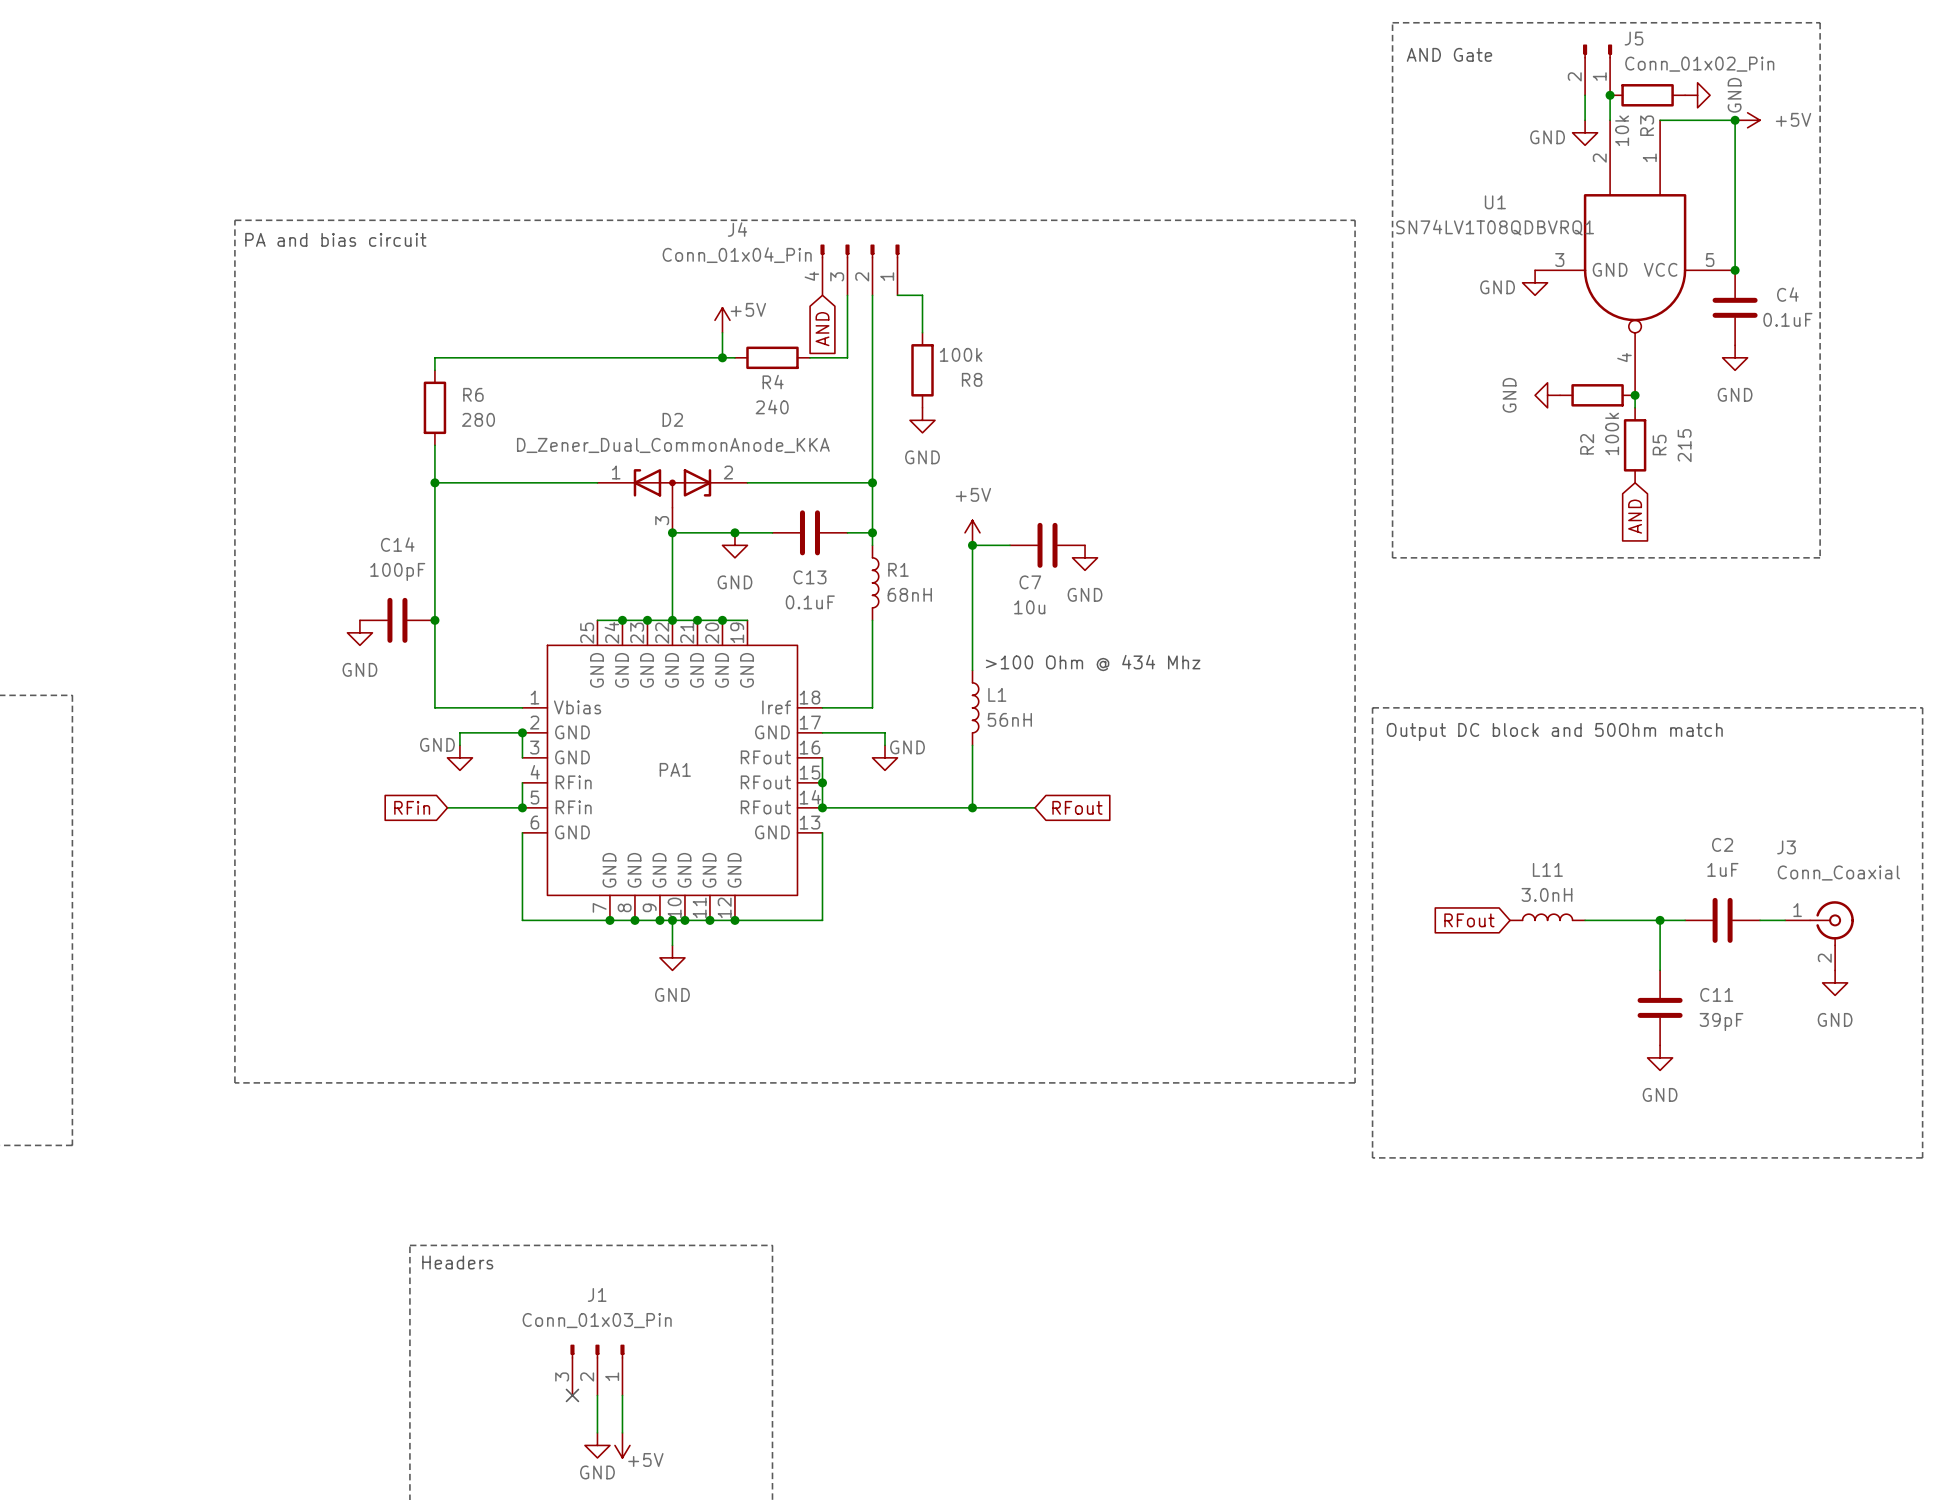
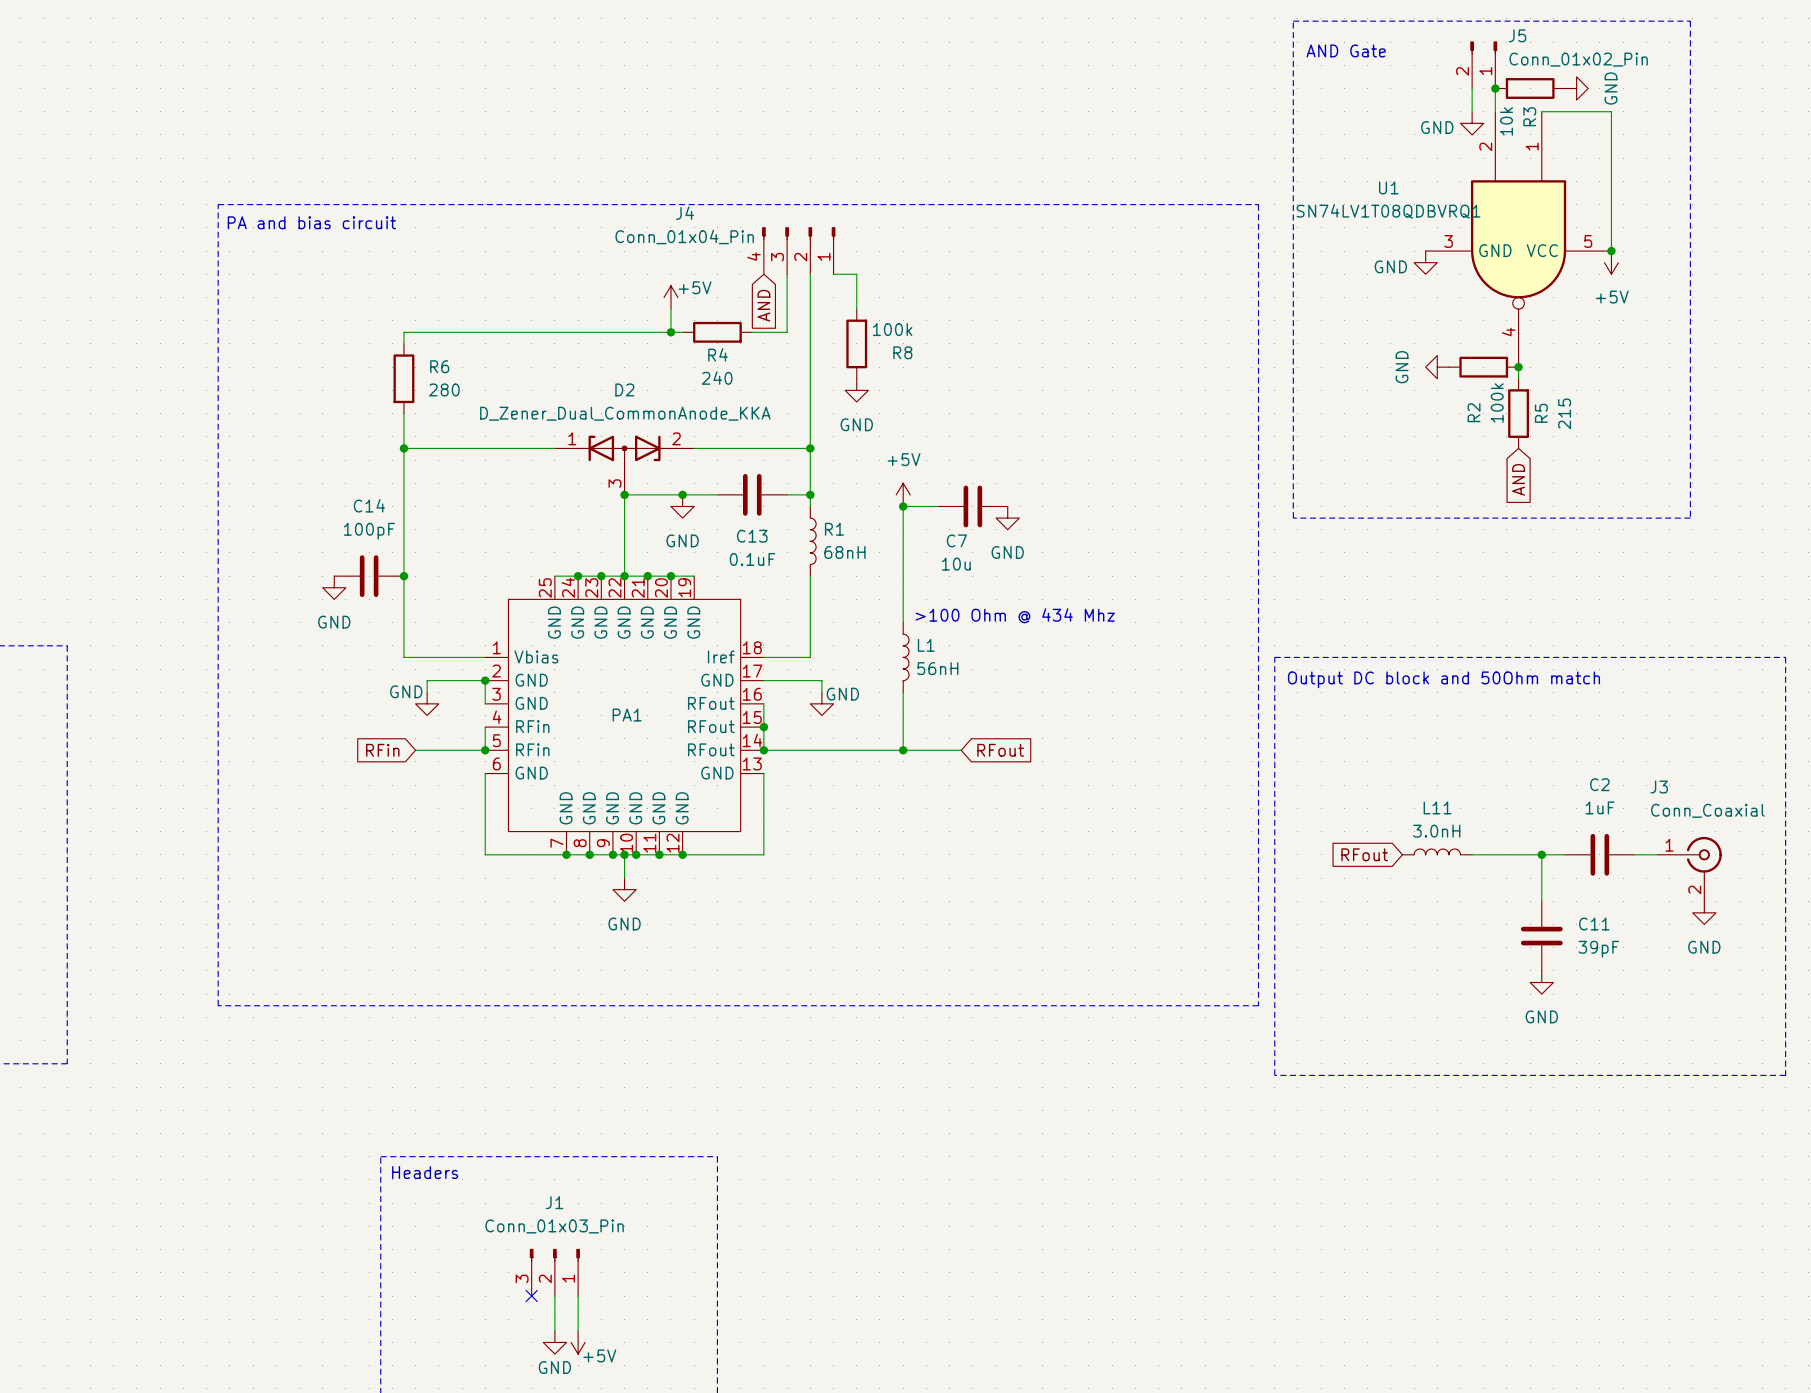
junction: (1735, 120) -> none
power symbol rotation: 0° (1747, 120) -> 90° clockwise (1611, 262)
power symbol position: +5V (1747, 120) -> +5V (1611, 262)
C4: 0.1uF (1735, 307) -> none
power symbol: GND (1735, 357) -> none

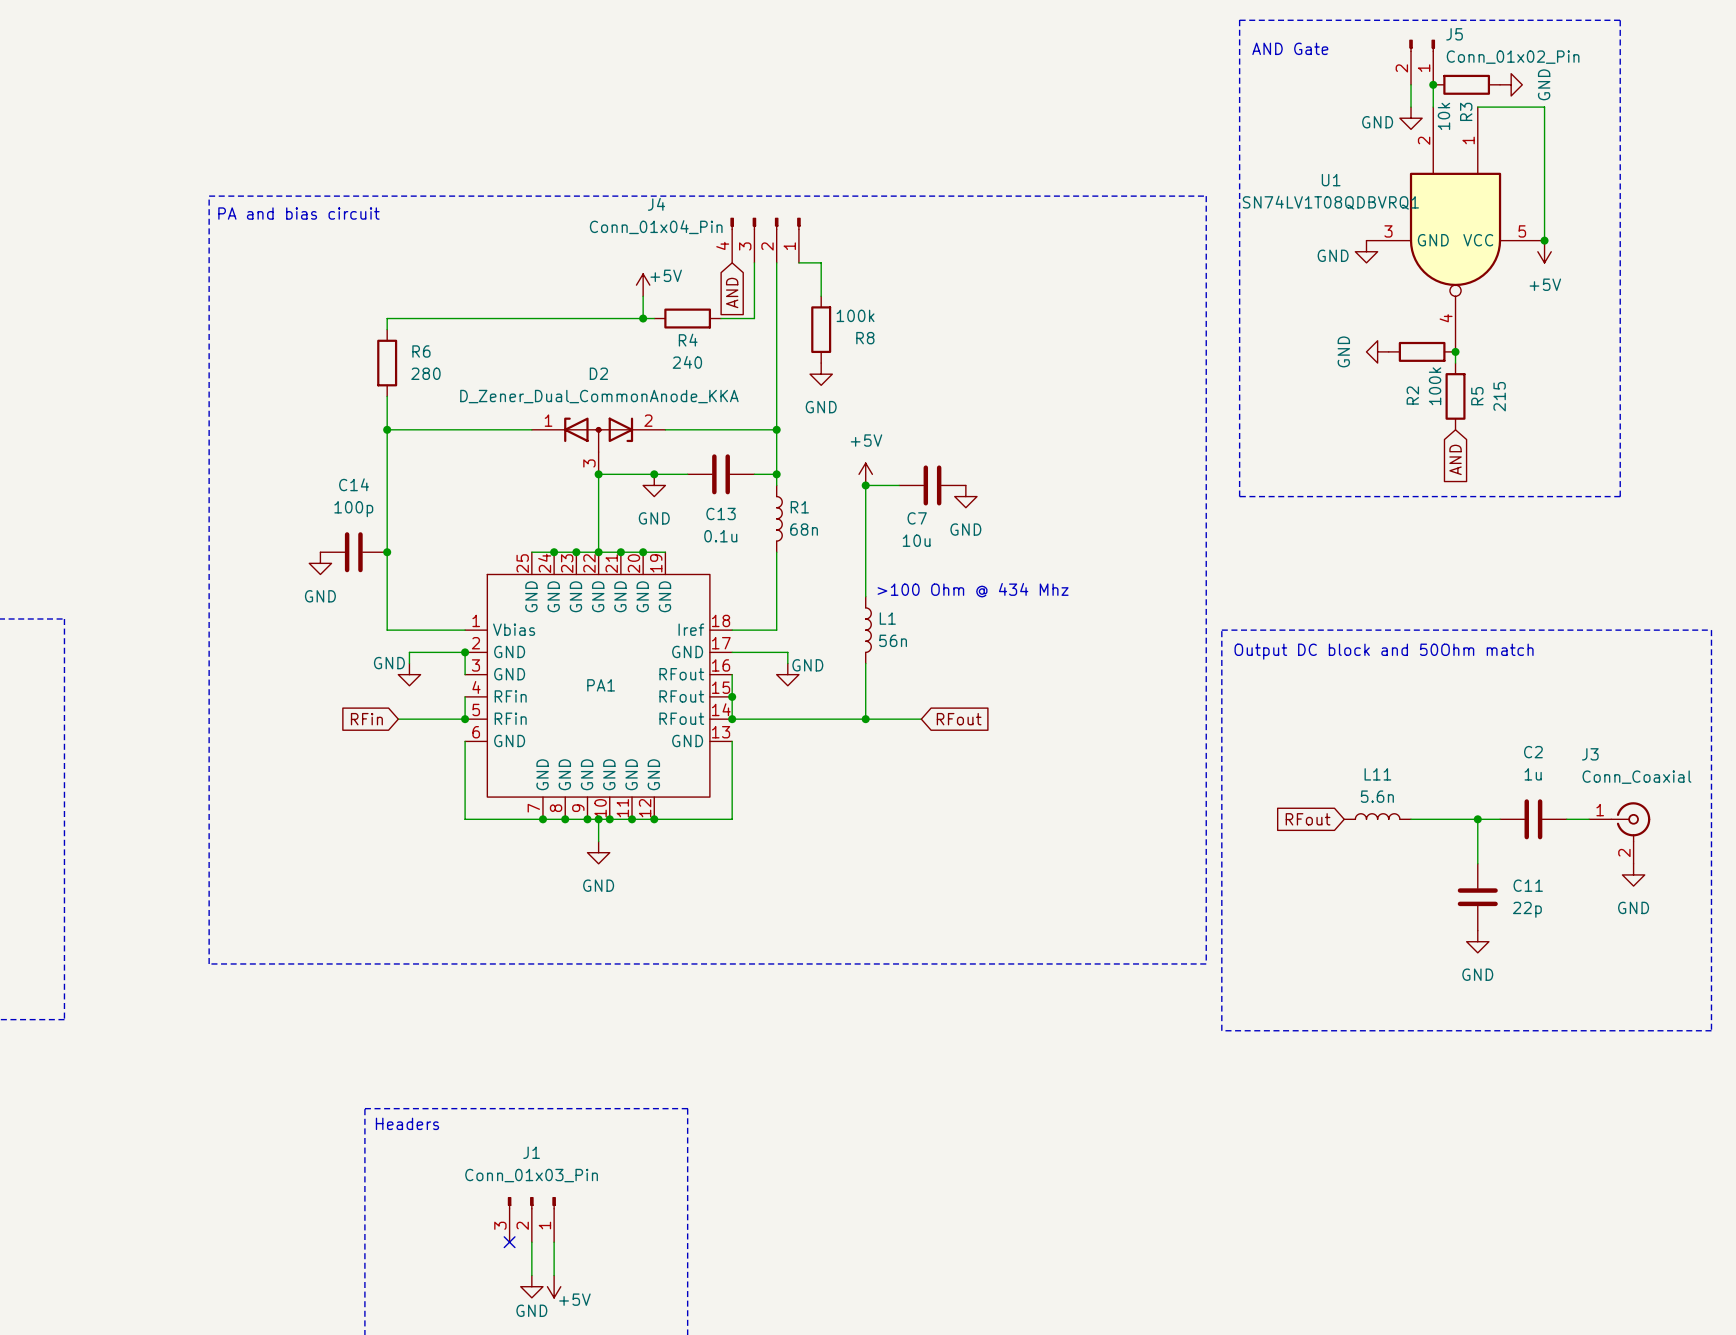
C14 value: 100pF (369, 531) -> 100p (353, 509)
R1 value: 68nH (844, 552) -> 68n (804, 529)
C13 value: 0.1uF (752, 559) -> 0.1u (720, 536)
L1 value: 56nH (937, 668) -> 56n (893, 640)
C2 value: 1uF (1600, 807) -> 1u (1533, 774)
L11 value: 3.0nH (1436, 831) -> 5.6n (1377, 796)
C11 value: 39pF (1598, 949) -> 22p (1527, 909)

